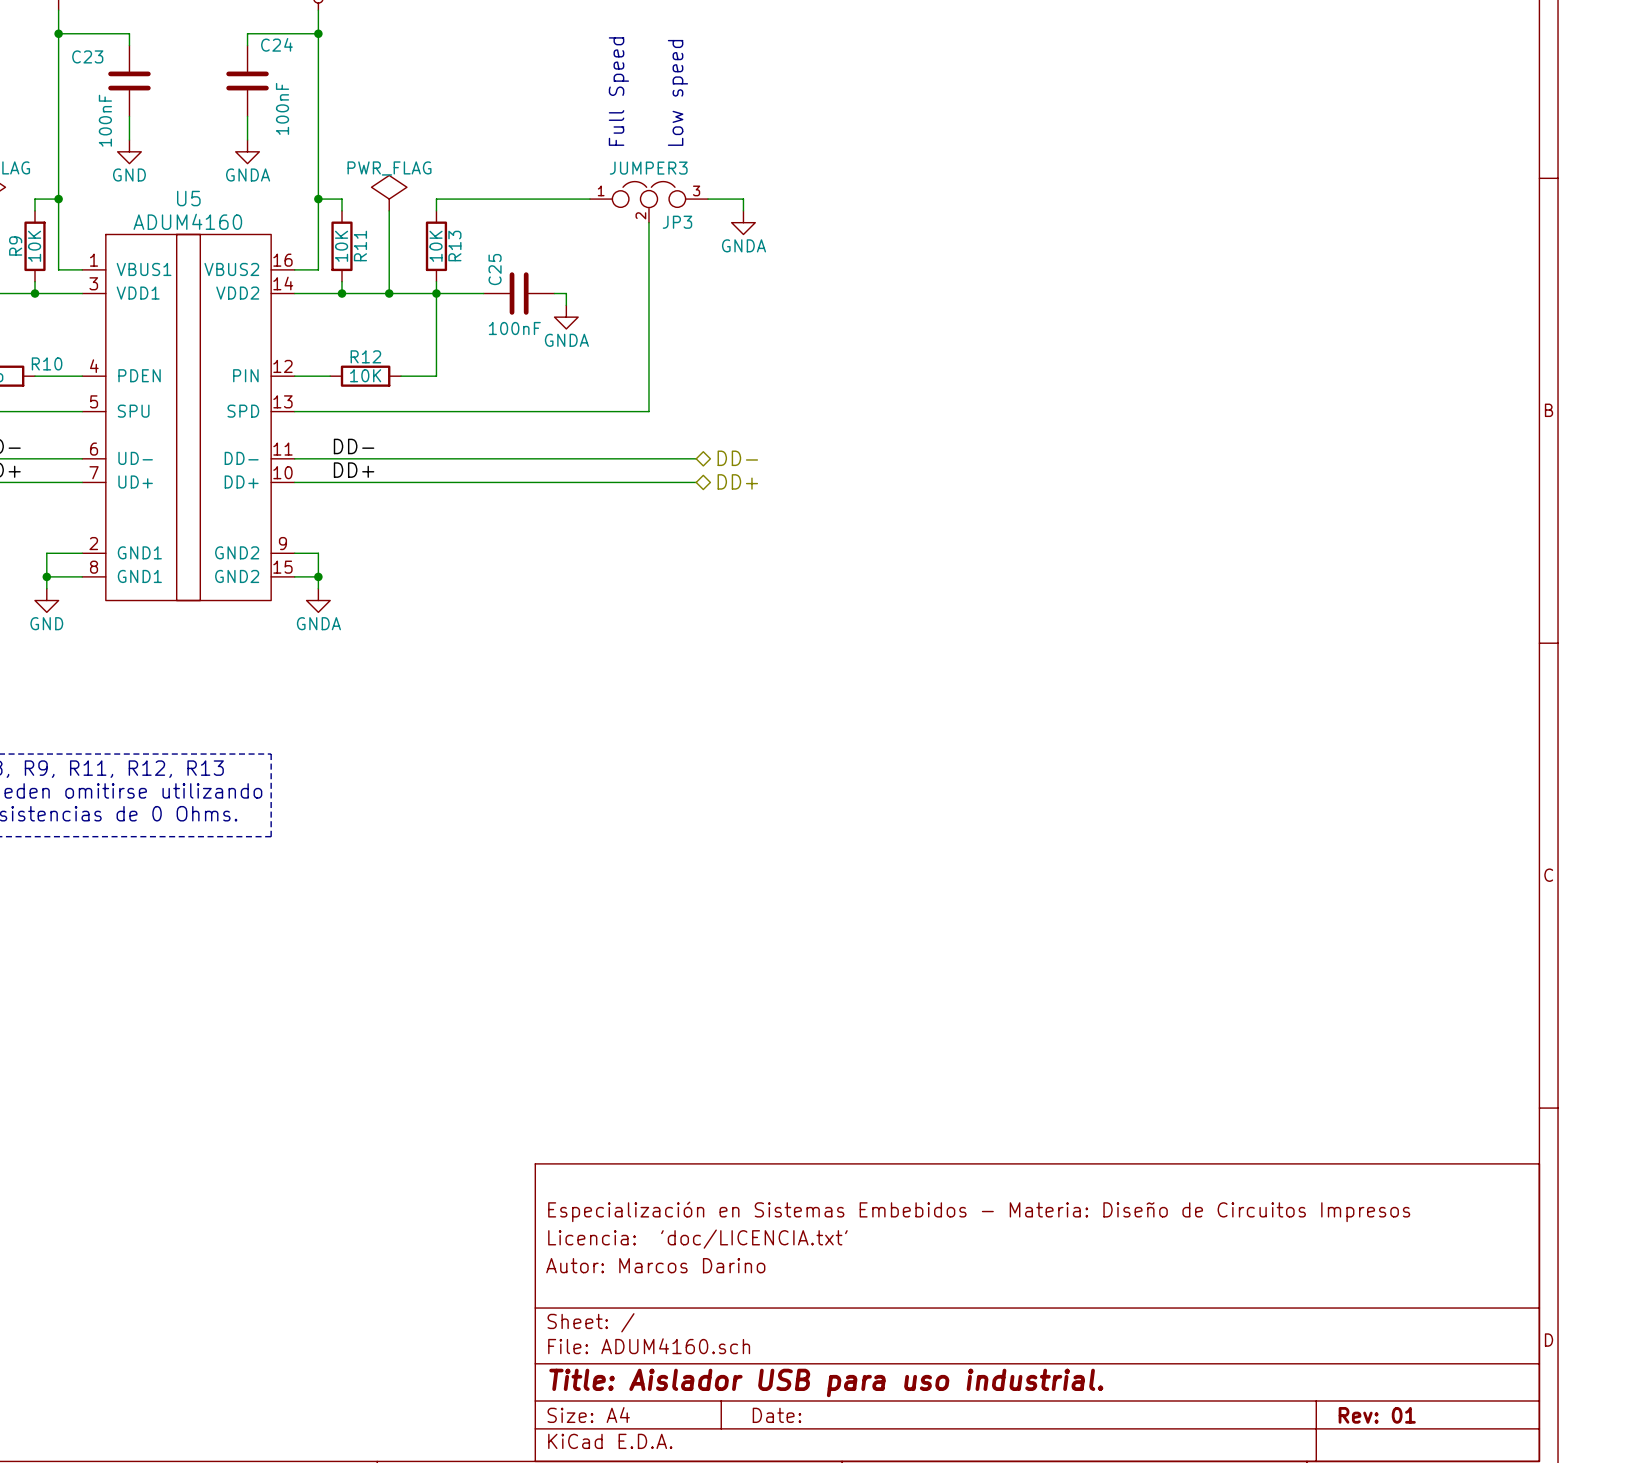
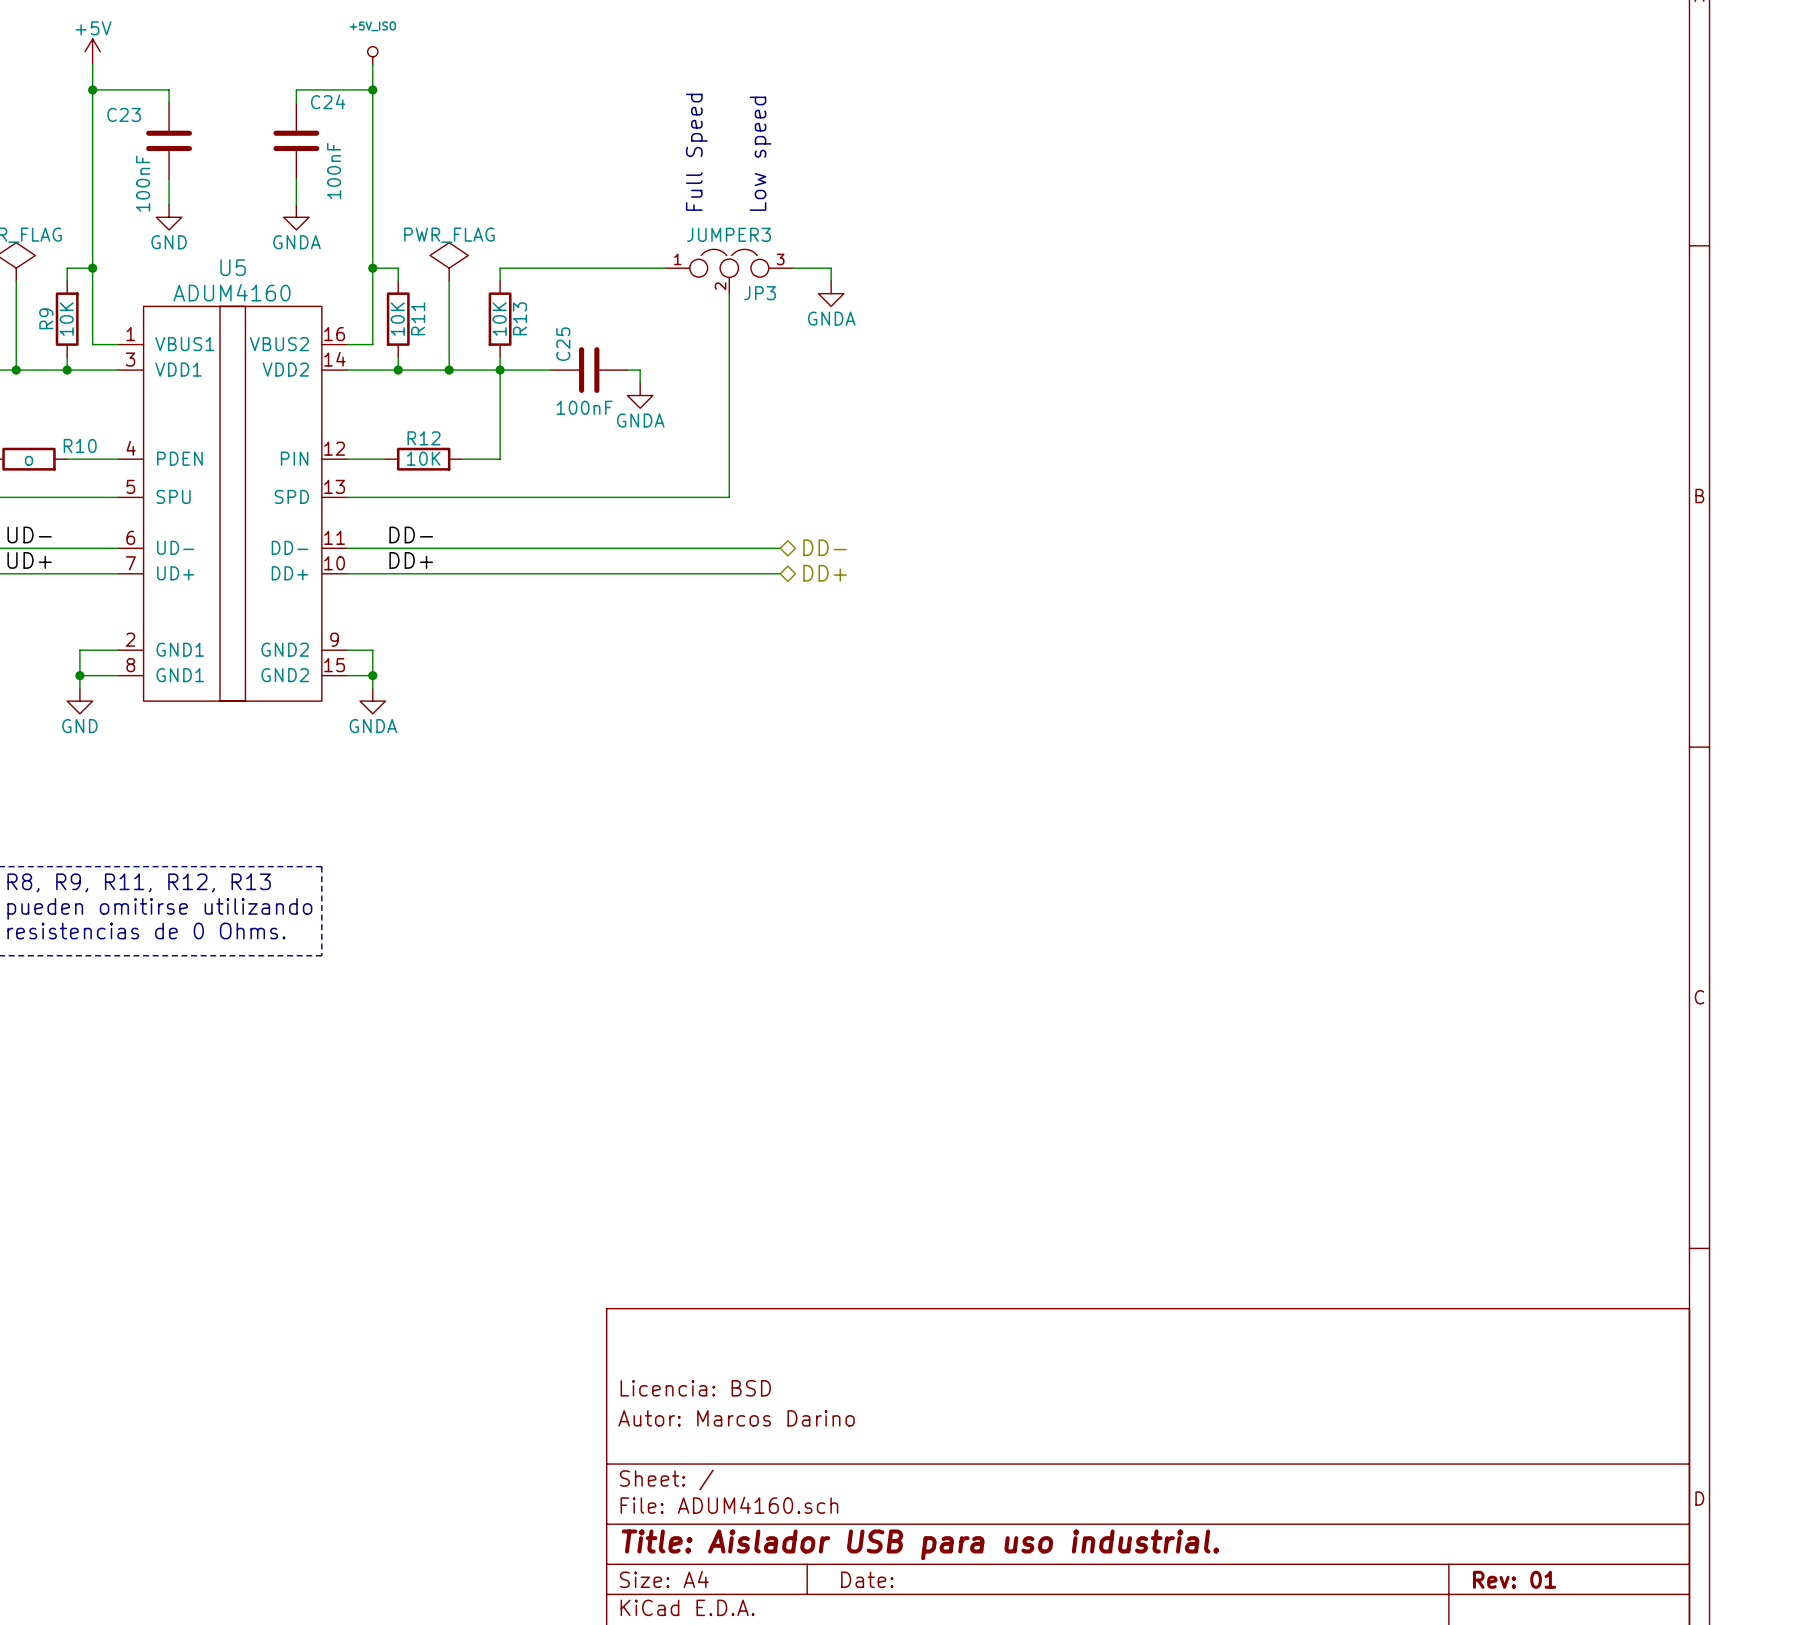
title block: Especialización en Sistemas Embebidos - Materia: Diseño de Circuitos Impresos (979, 1211) -> none
title block: Licencia: 'doc/LICENCIA.txt' (697, 1239) -> Licencia: BSD (695, 1388)

